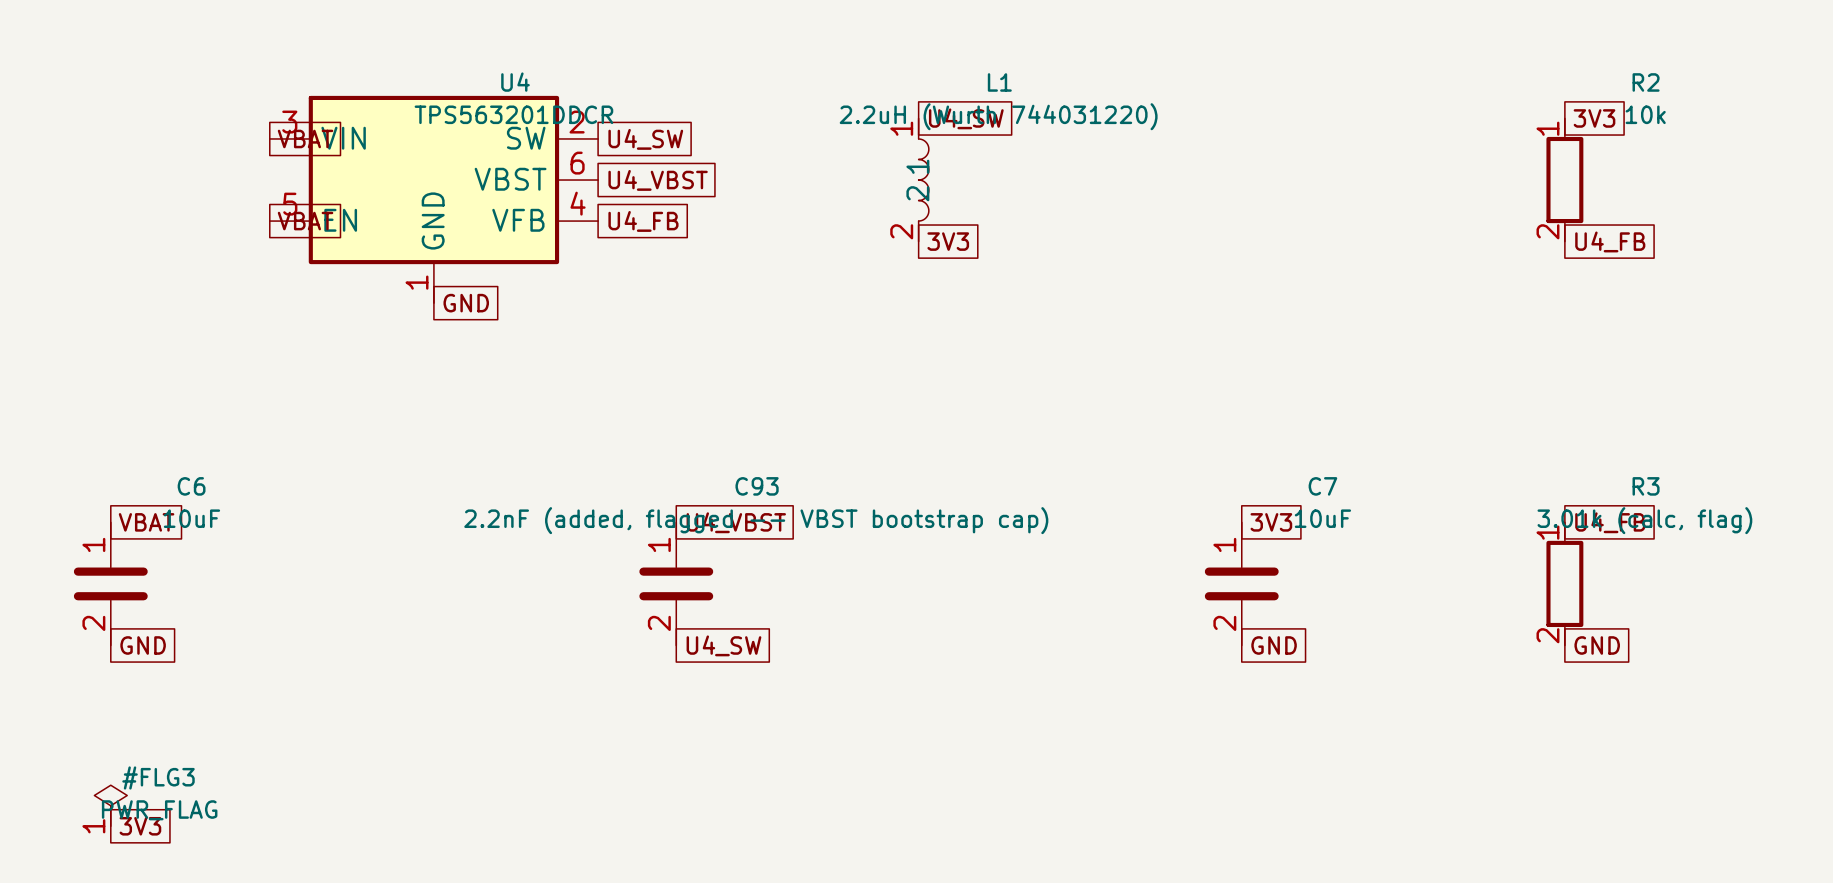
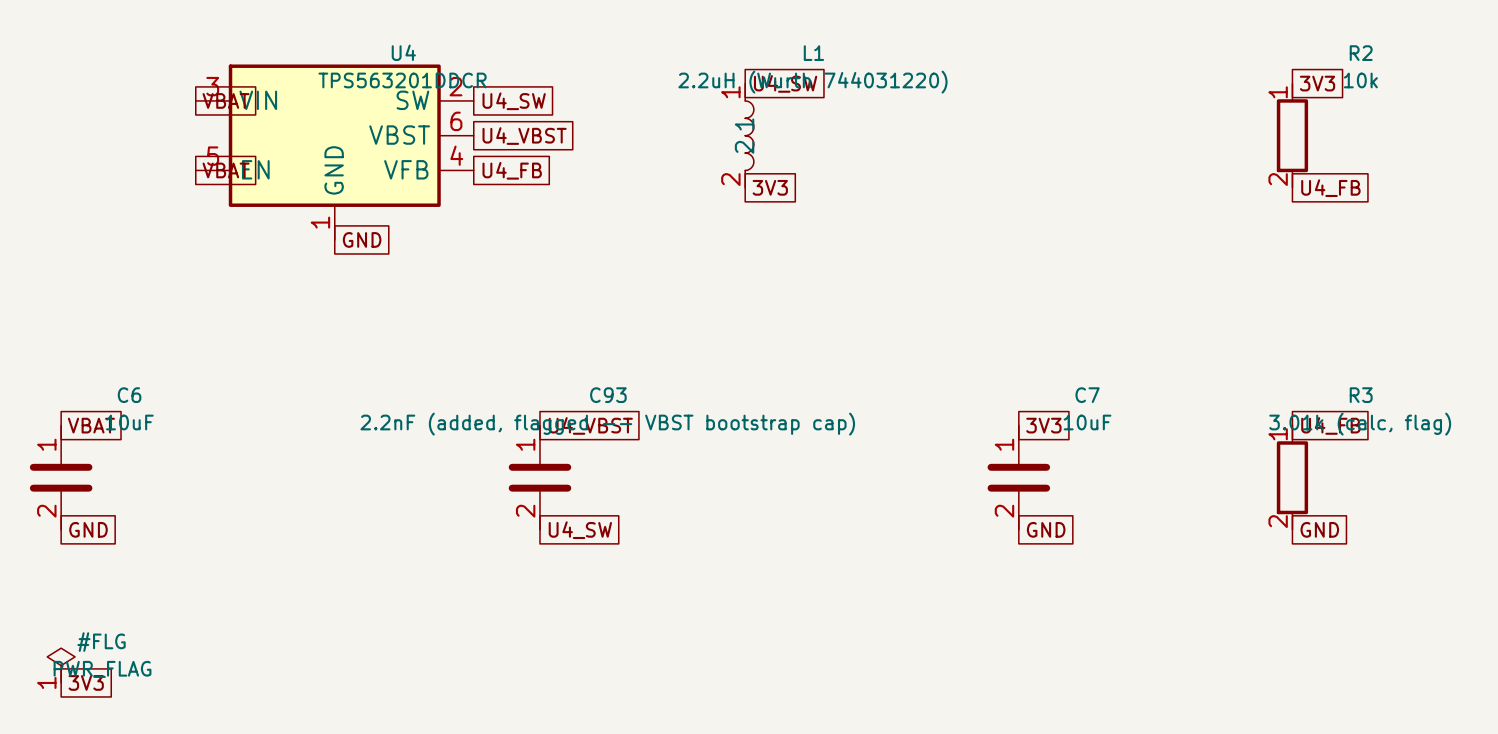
#FLG3 name: #FLG3 (158, 777) -> #FLG (101, 642)

